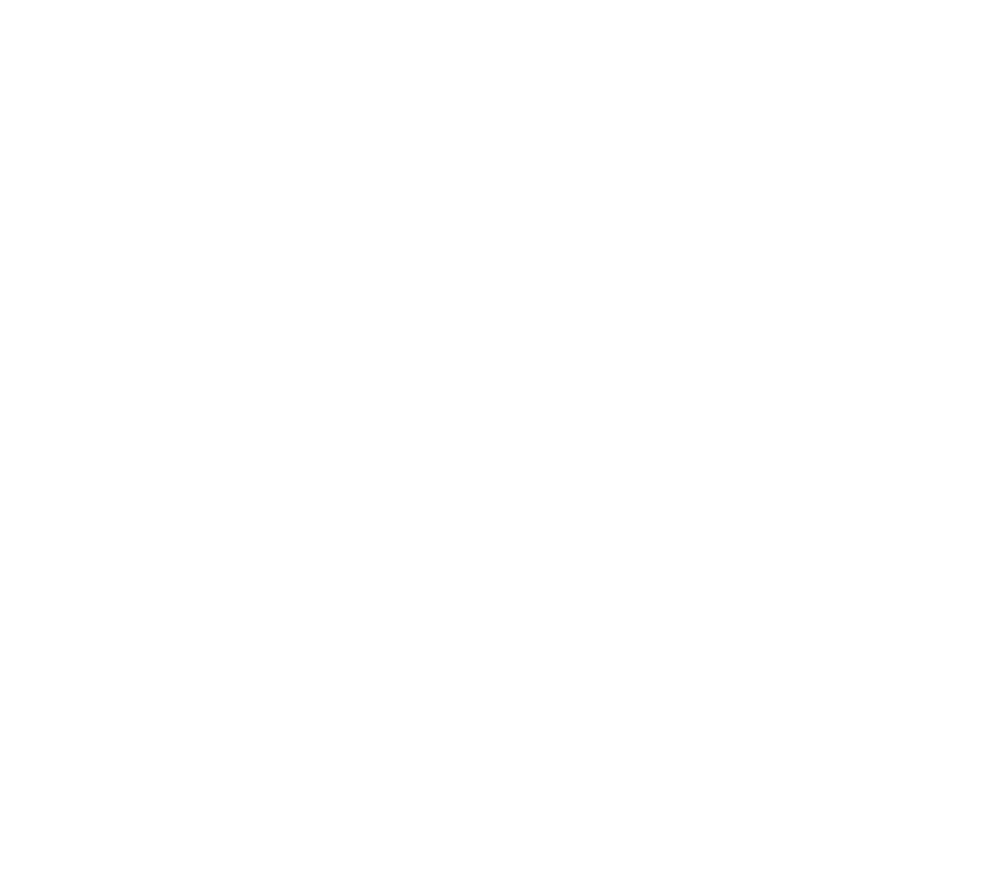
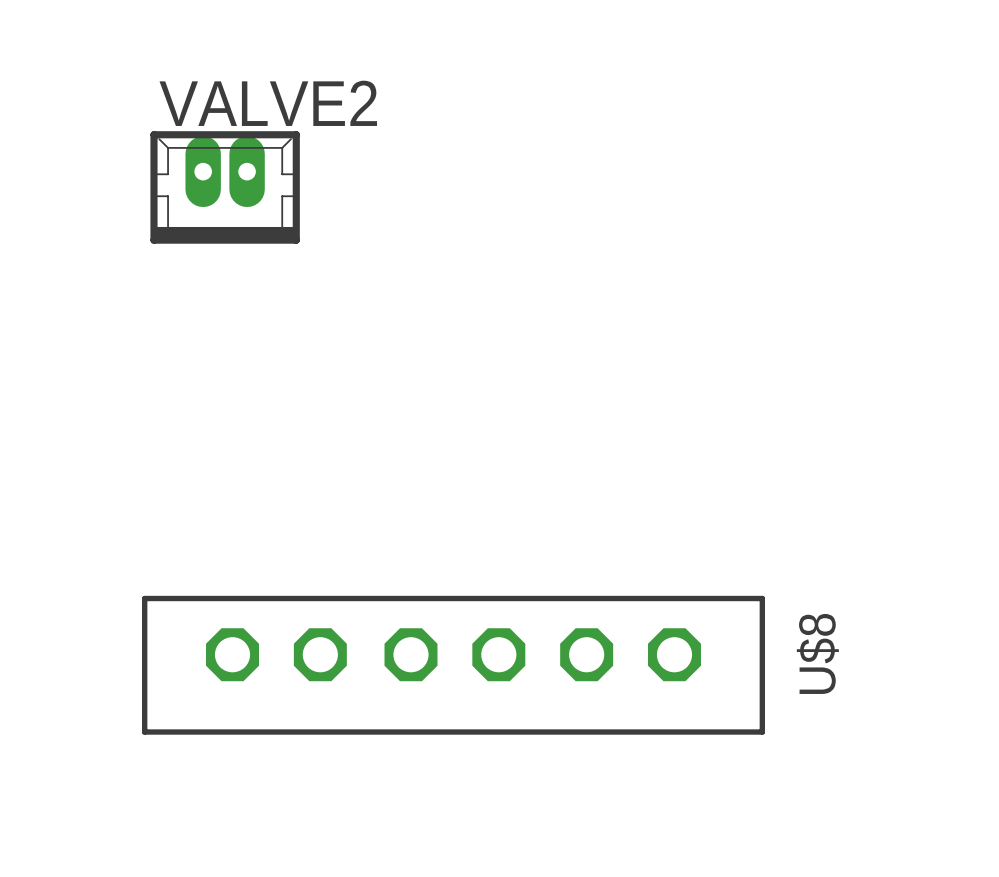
VALVE2: none -> (225, 187)
U$8: none -> (453, 665)

